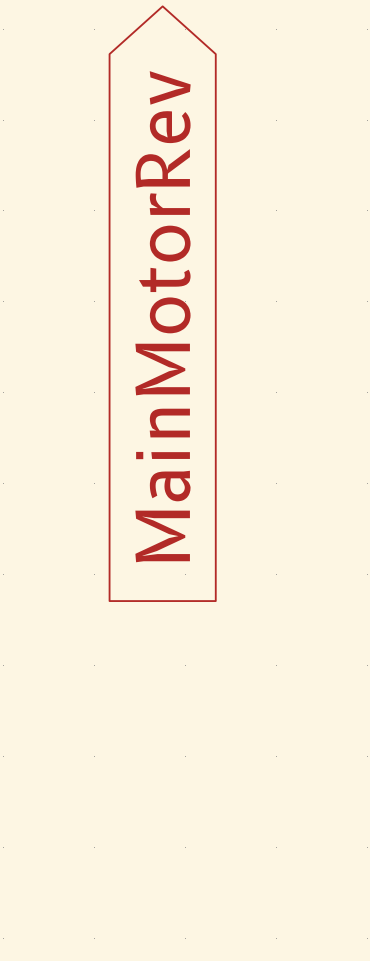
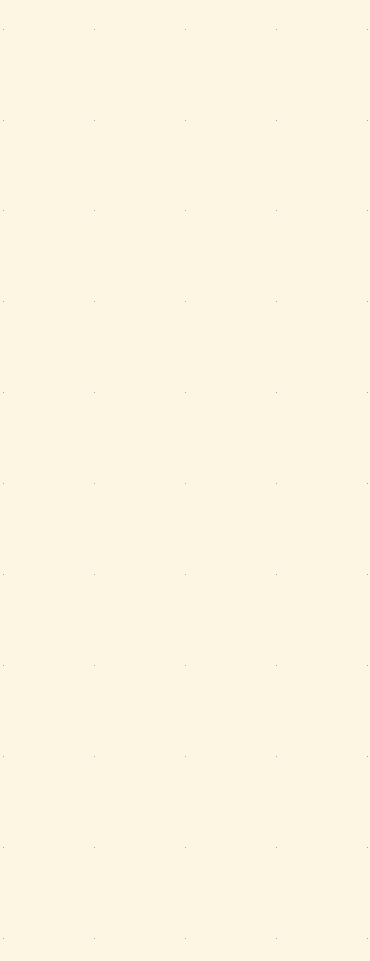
global label: MainMotorRev (163, 316) -> none

